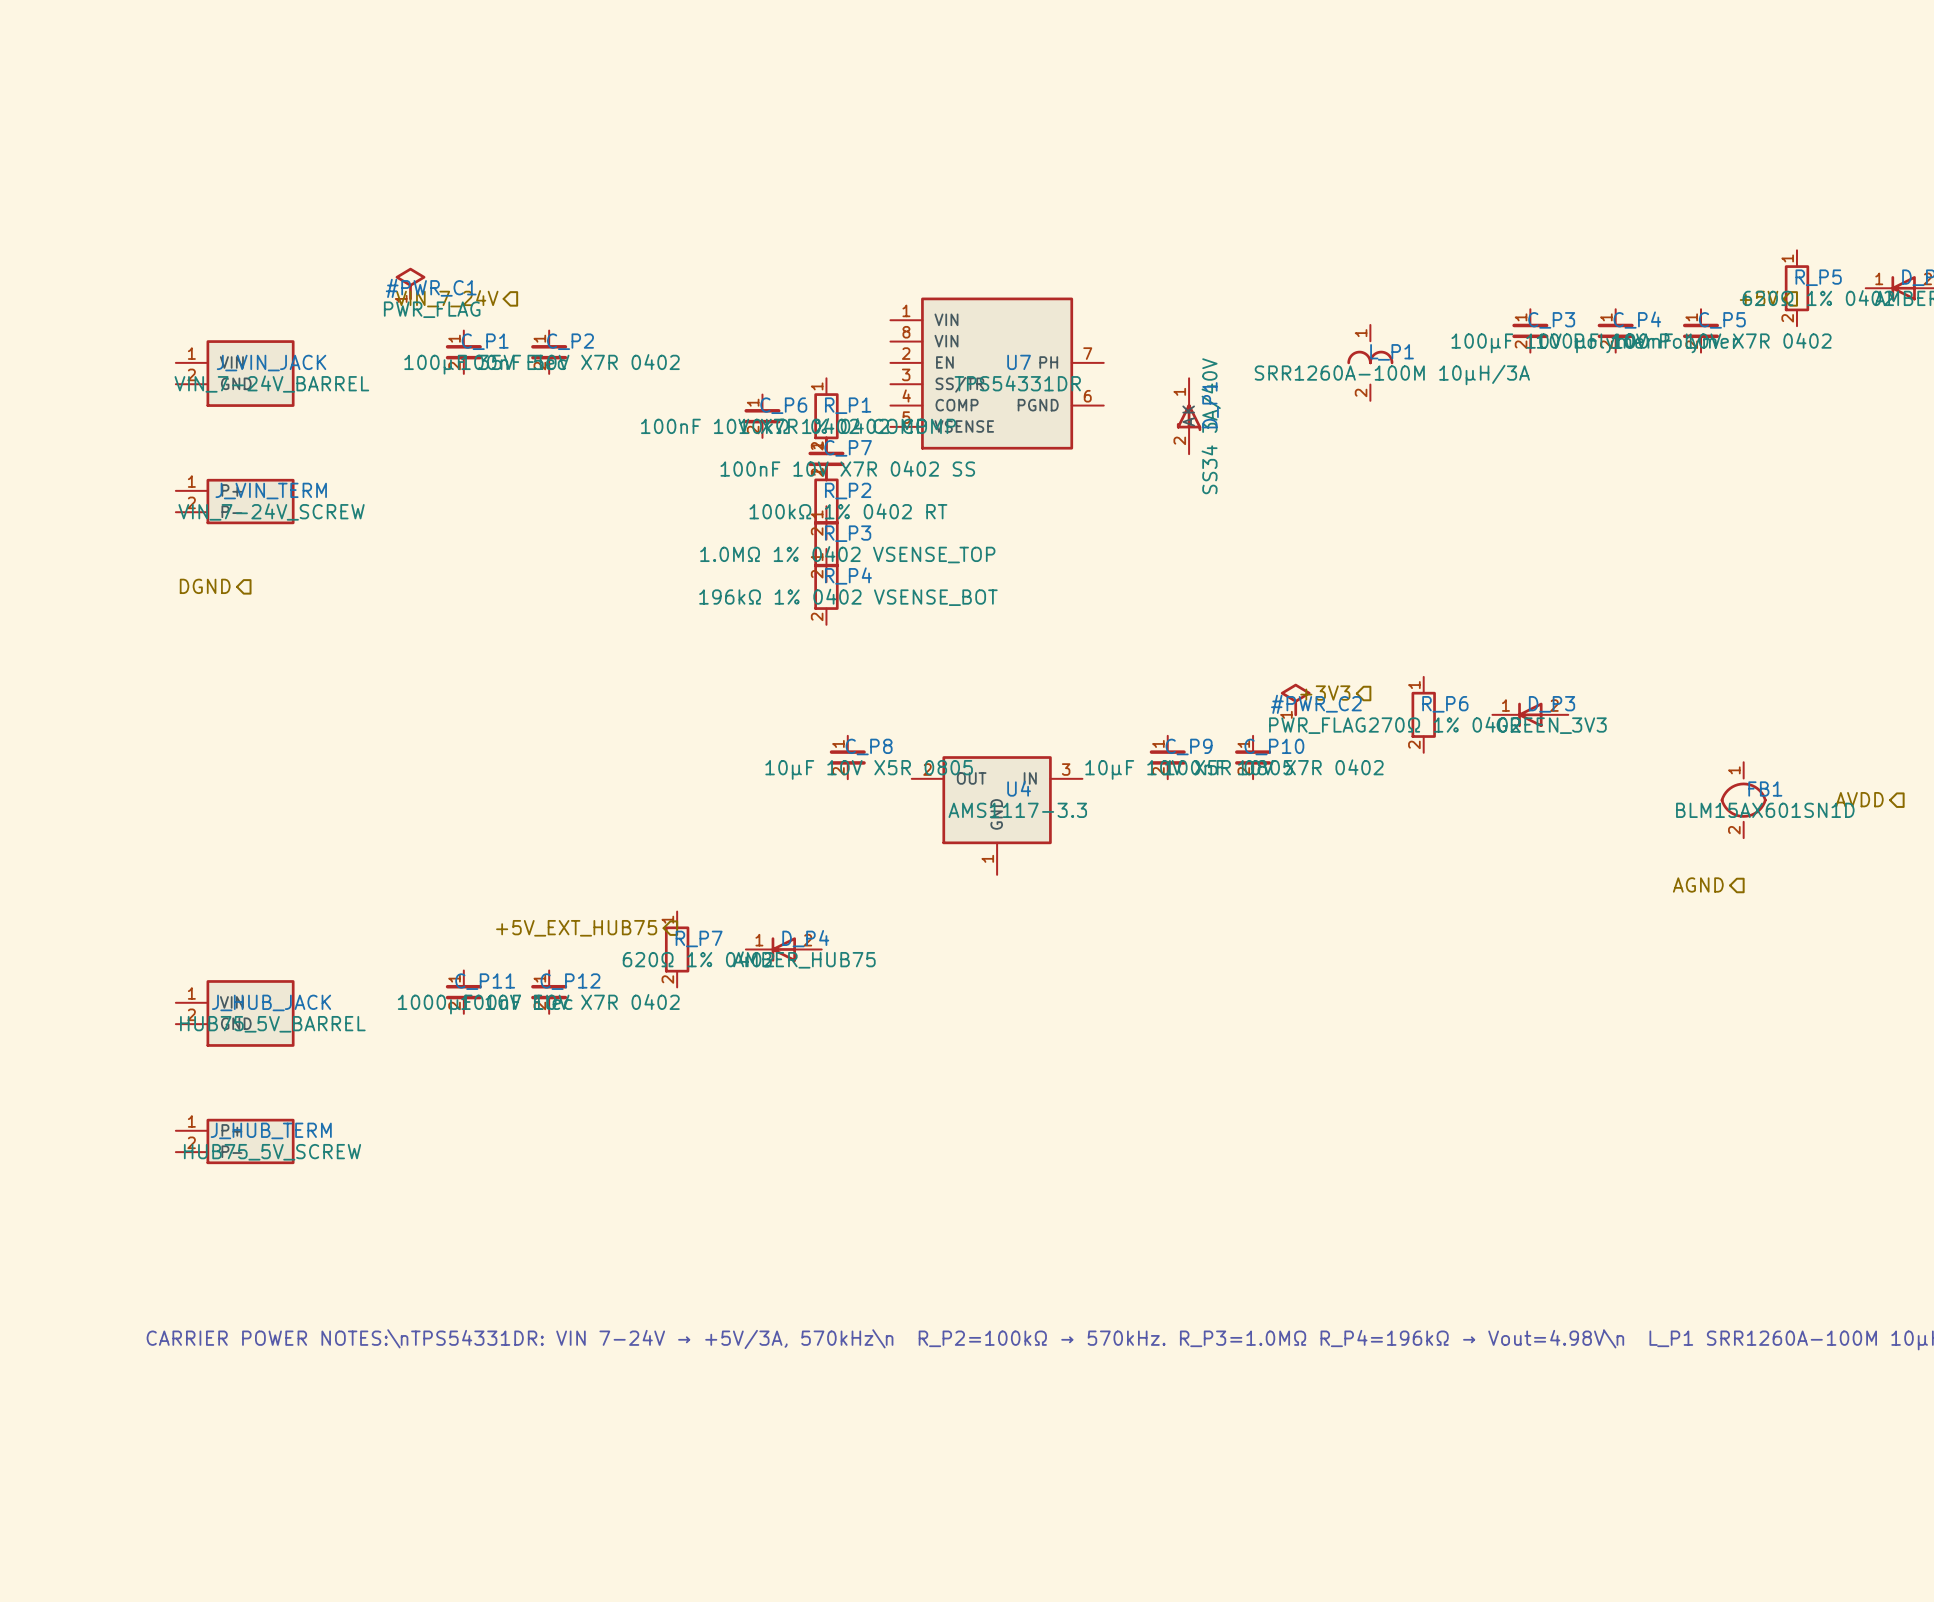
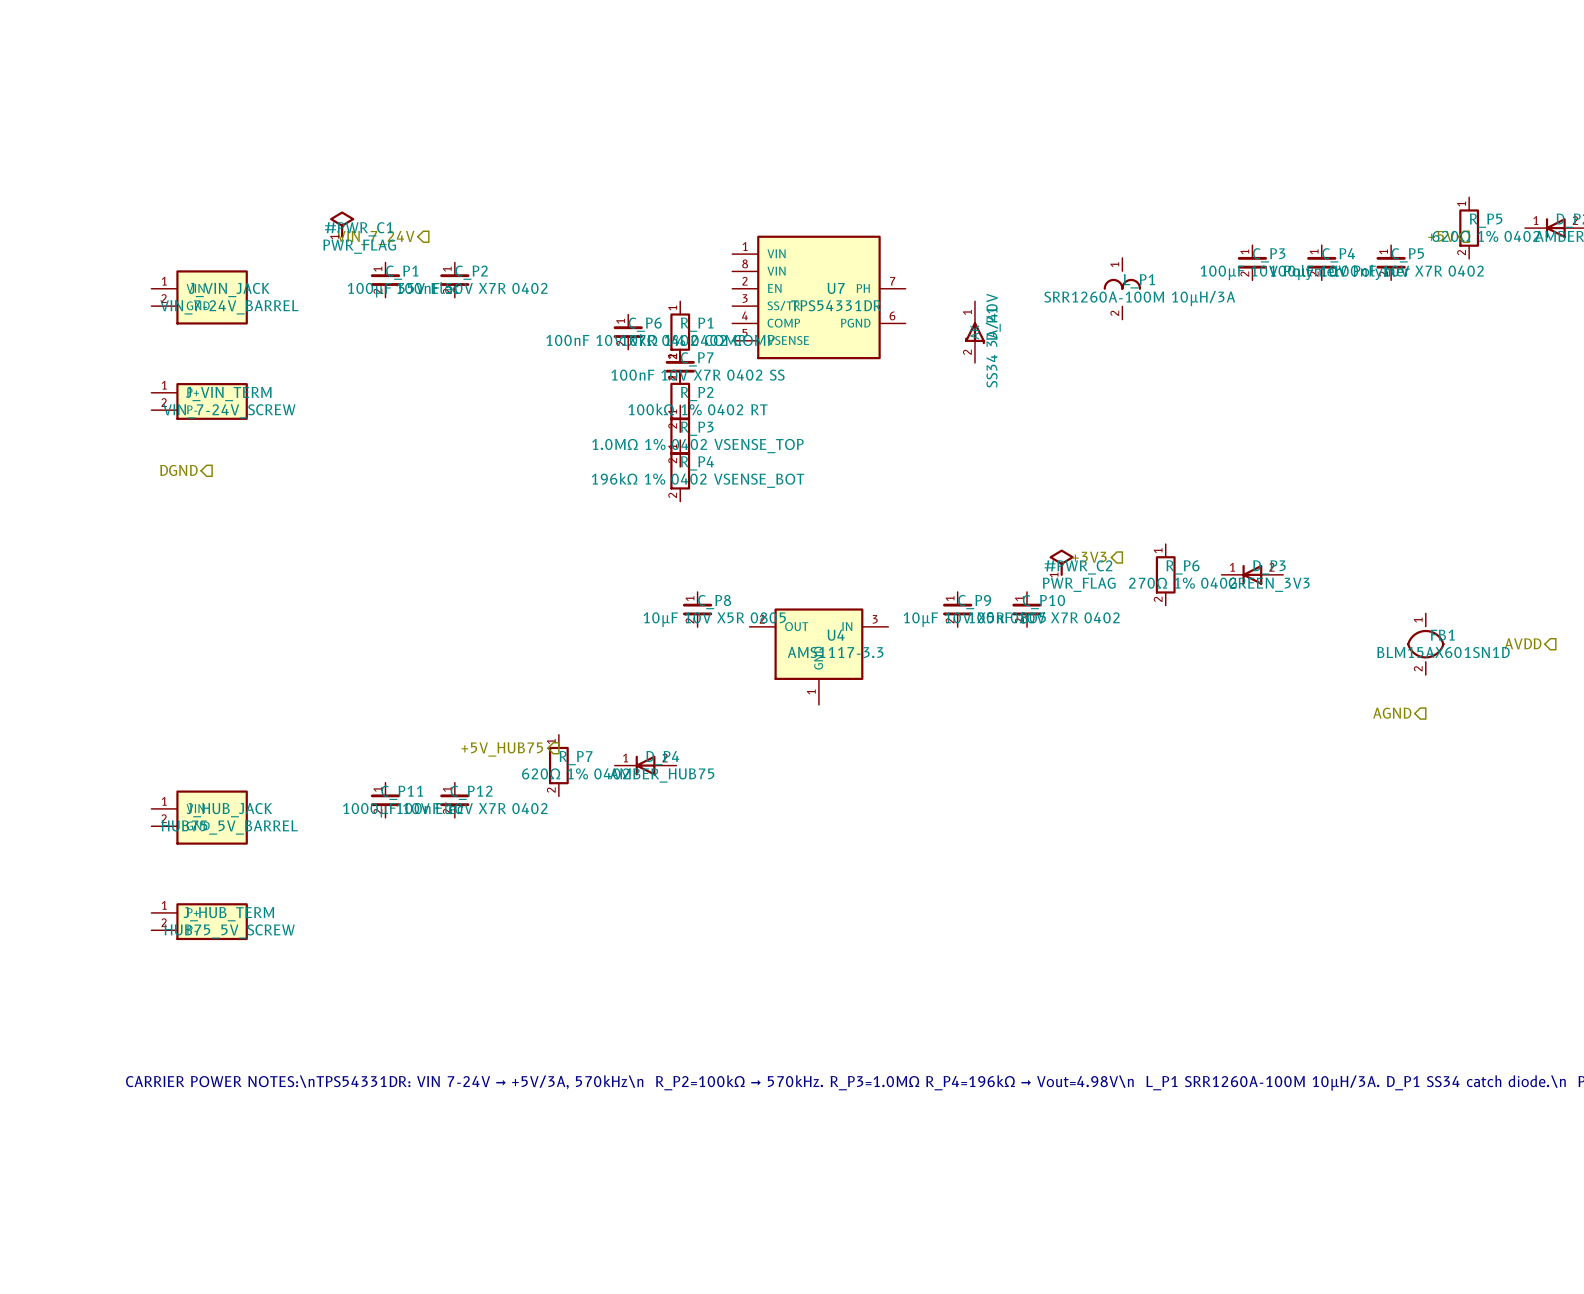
hierarchical label: +5V_EXT_HUB75 (576, 928) -> +5V_HUB75 (502, 749)

